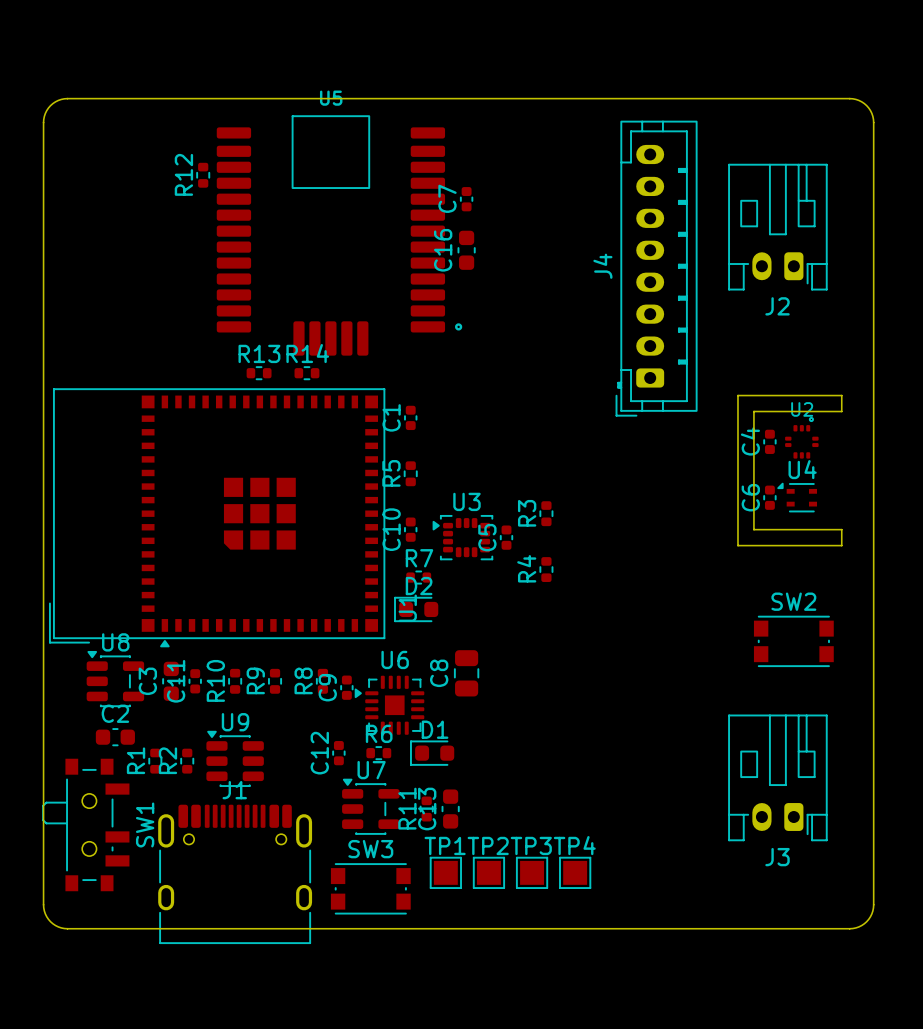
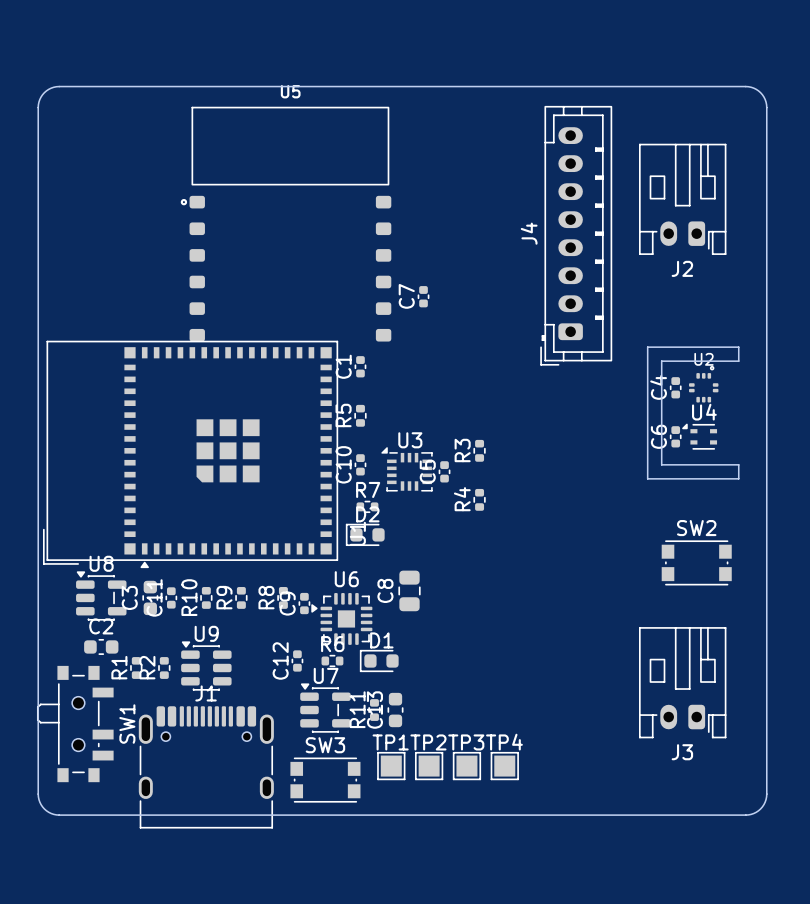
U5 footprint: [216, 115, 463, 356] -> [180, 106, 392, 342]
R12: (203, 175) -> none
C7 position: (466, 199) -> (423, 296)
C16: (466, 250) -> none
R13: (259, 373) -> none
R14: (306, 373) -> none
U3 footprint: [432, 514, 494, 561] -> [381, 447, 433, 492]

